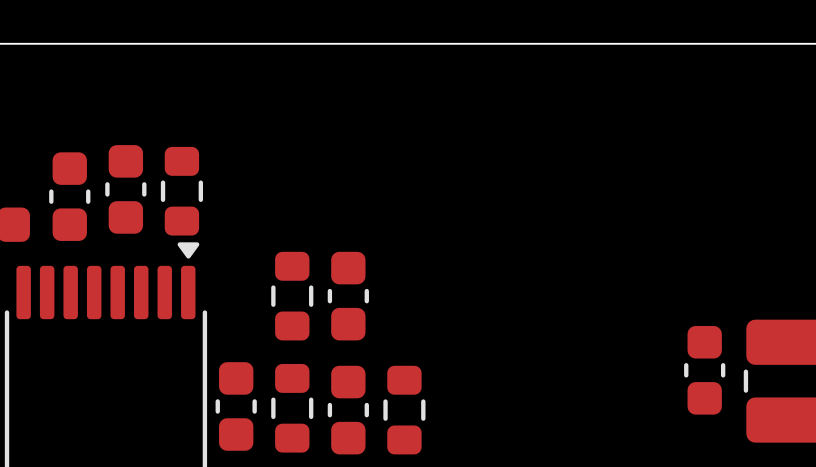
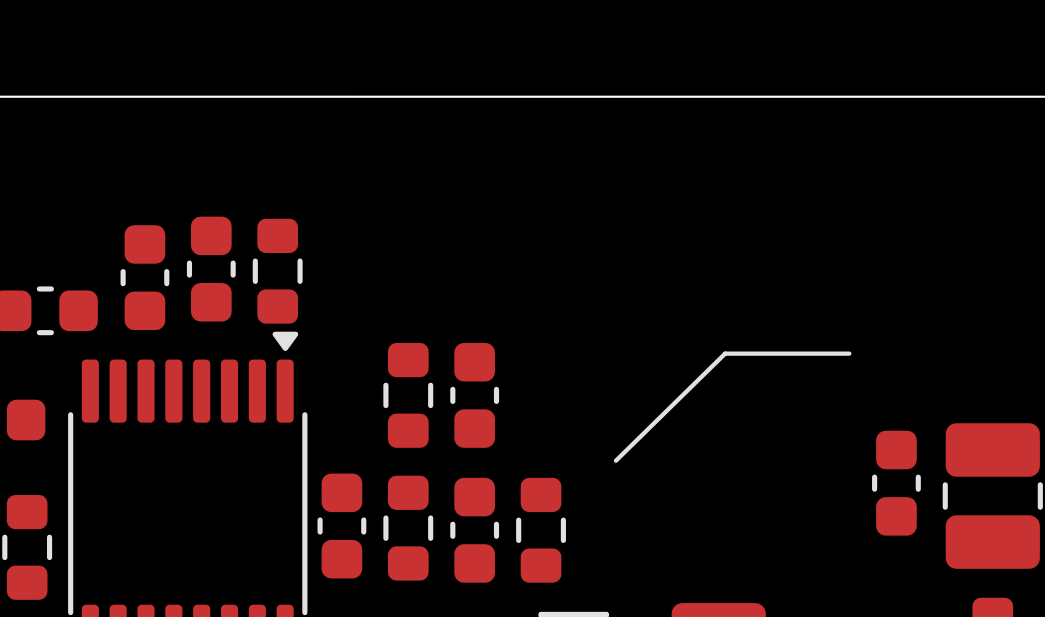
line: none -> (849, 353) (725, 353) (615, 460)

